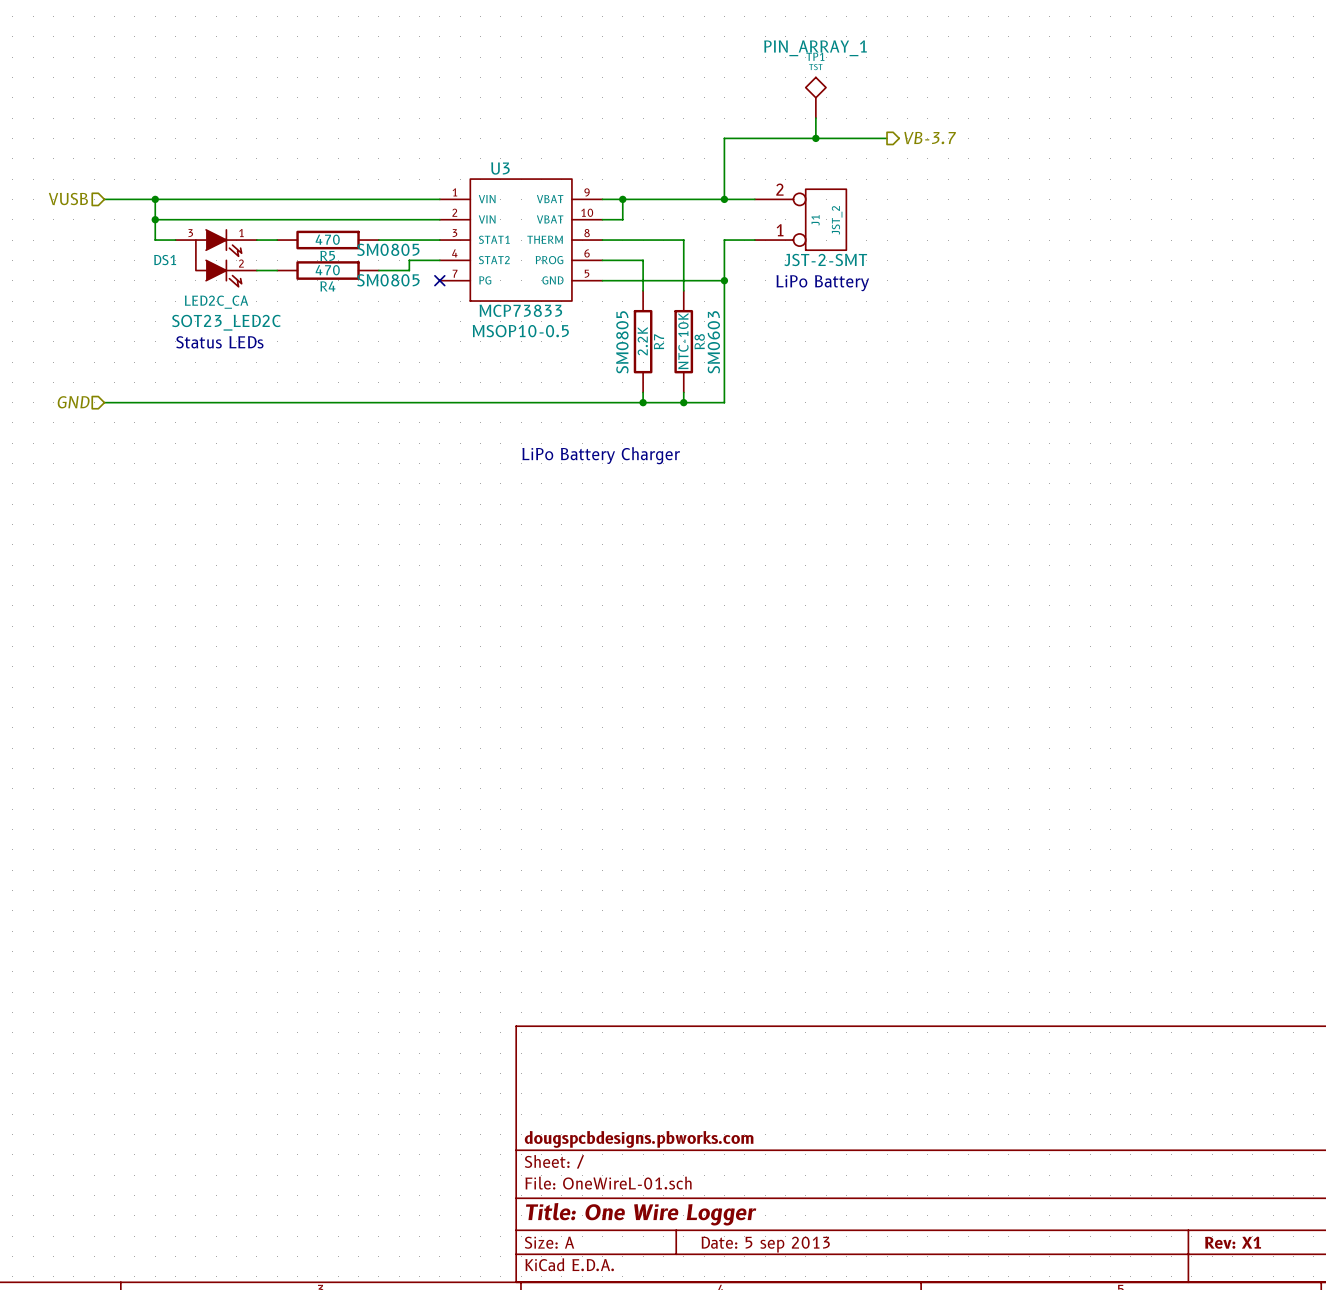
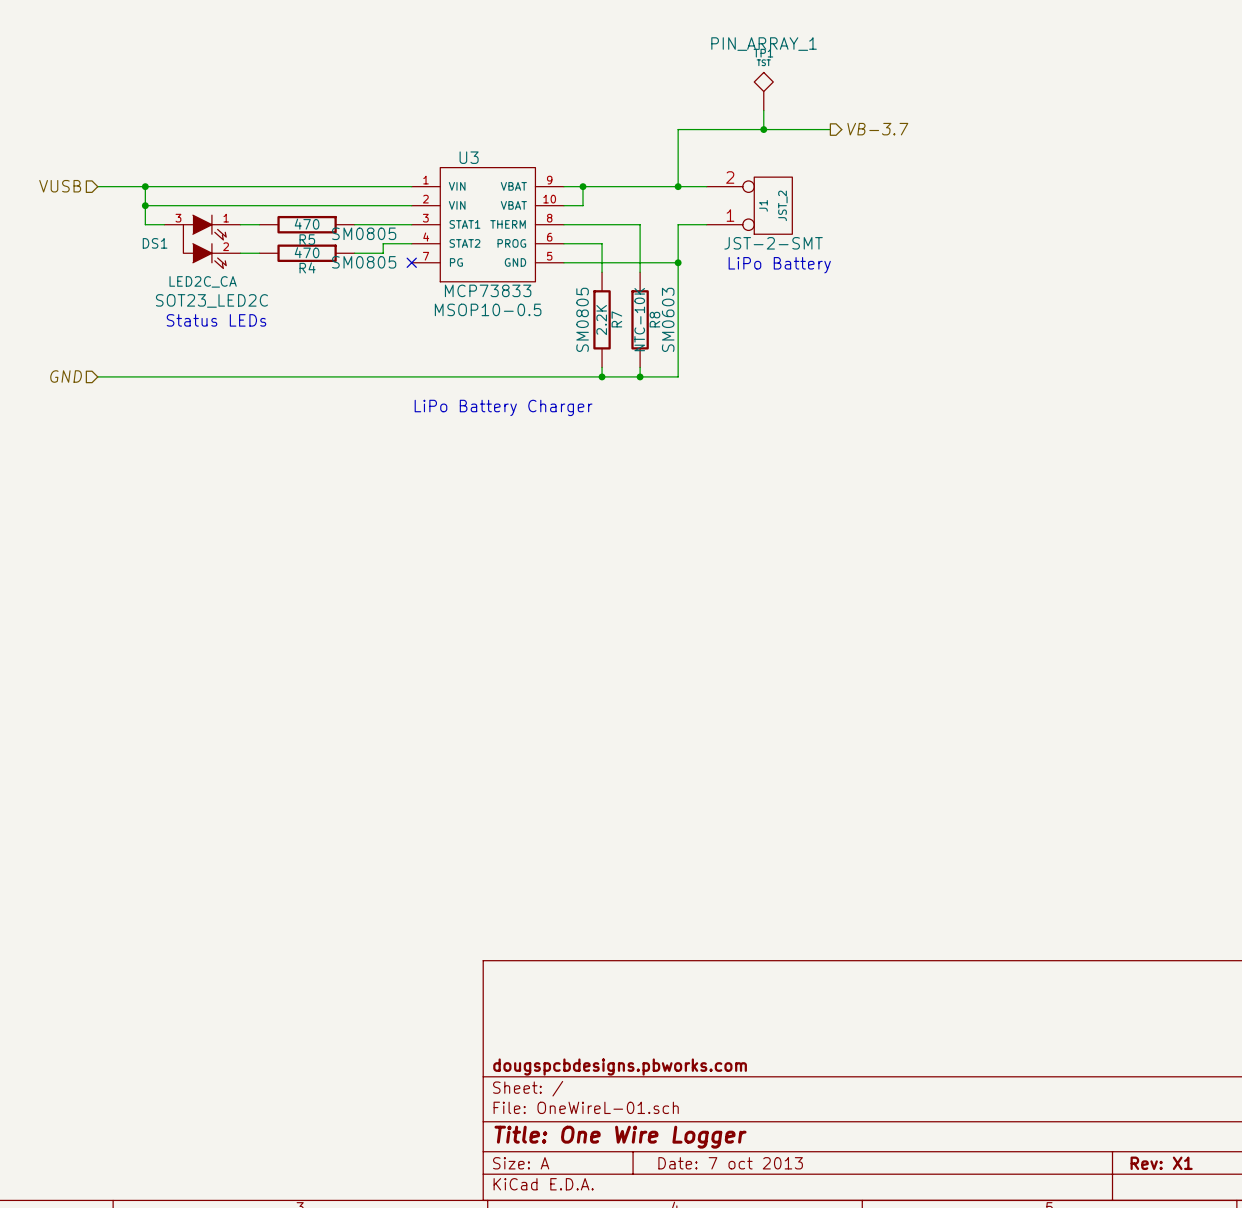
text position: LiPo Battery Charger (601, 455) -> LiPo Battery Charger (503, 407)
title block: Date: 5 sep 2013 (765, 1244) -> Date: 7 oct 2013 (730, 1163)

